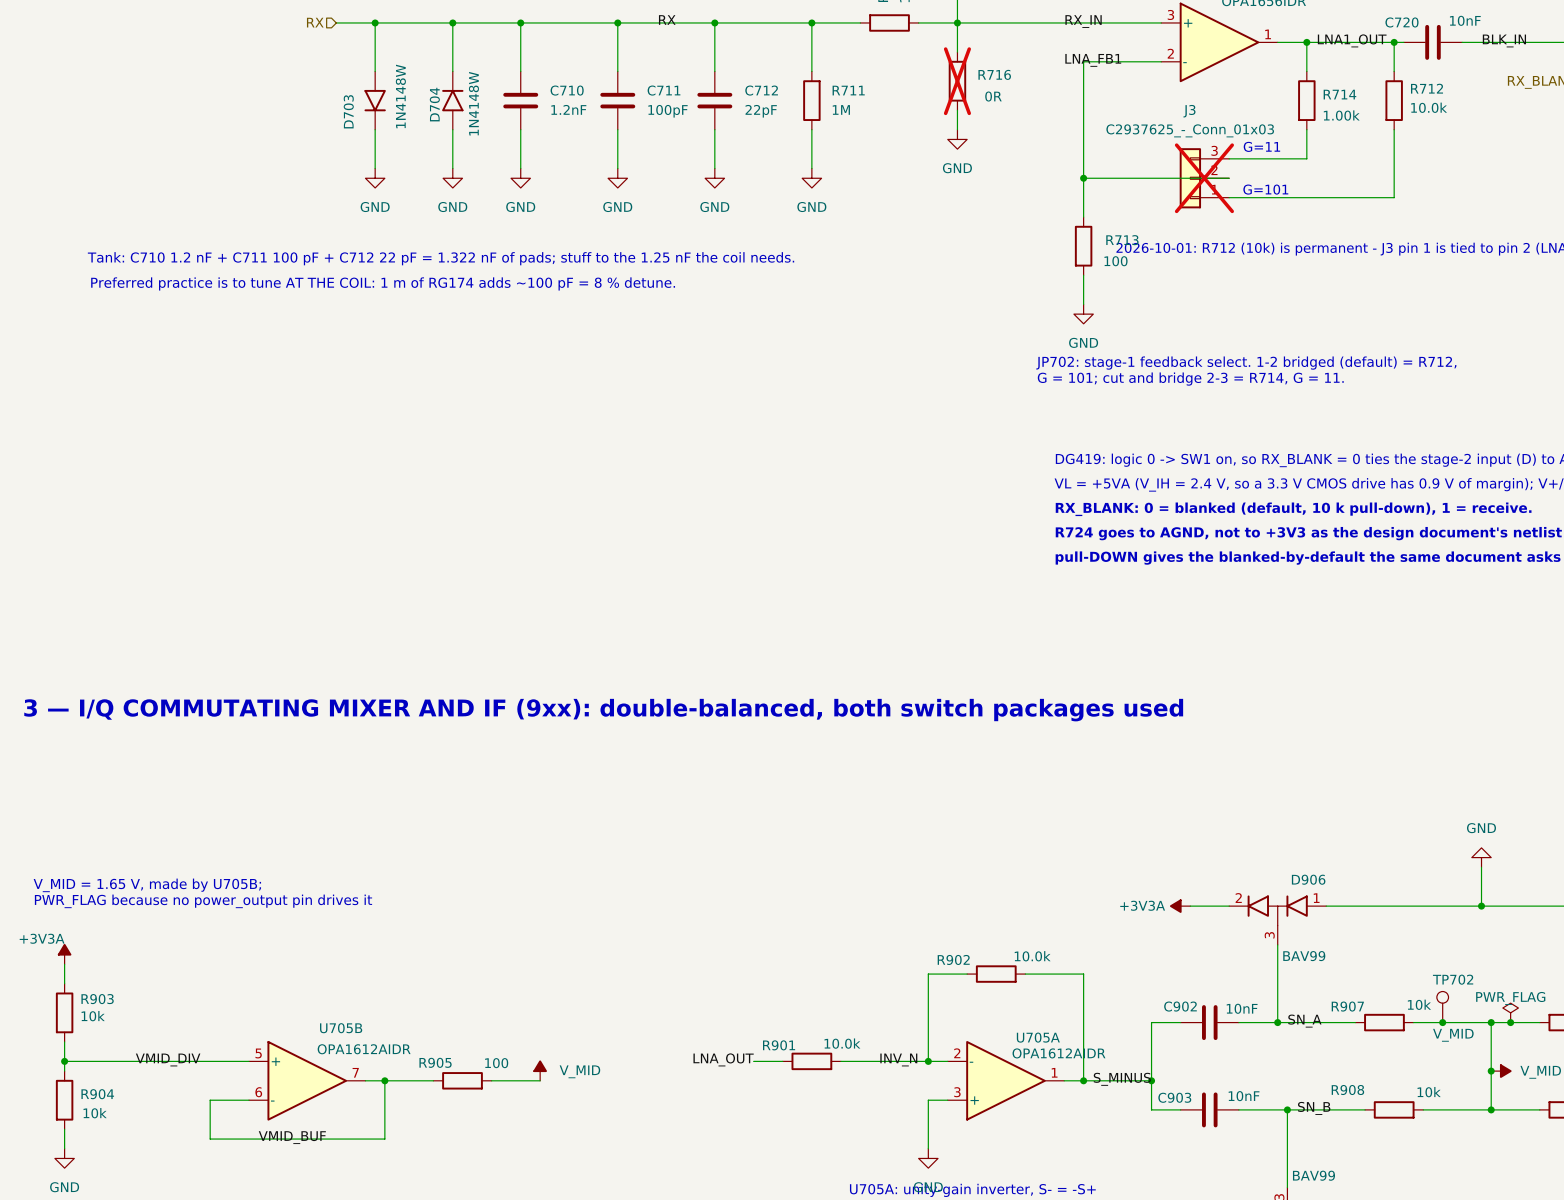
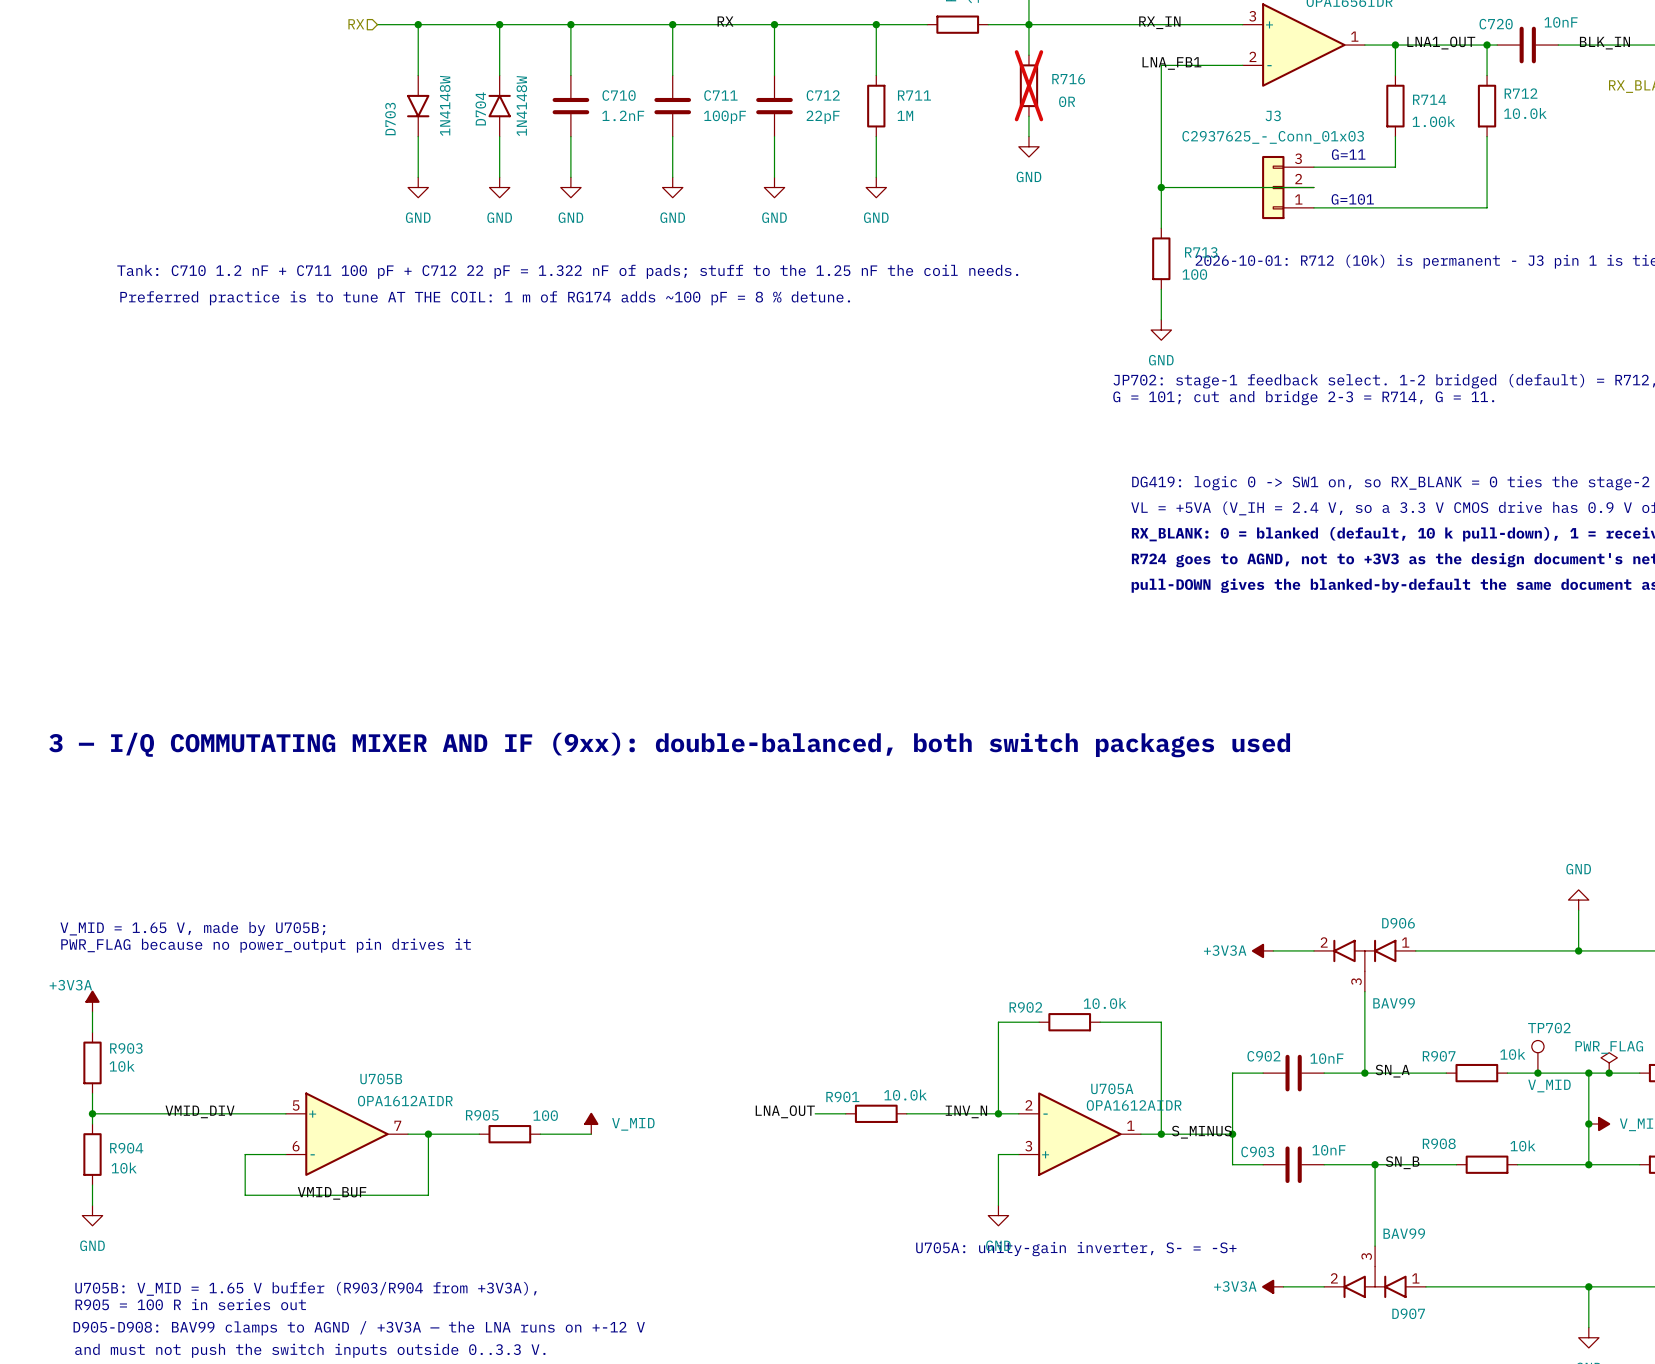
J3 do-not-place cross: (1204, 178) -> none

